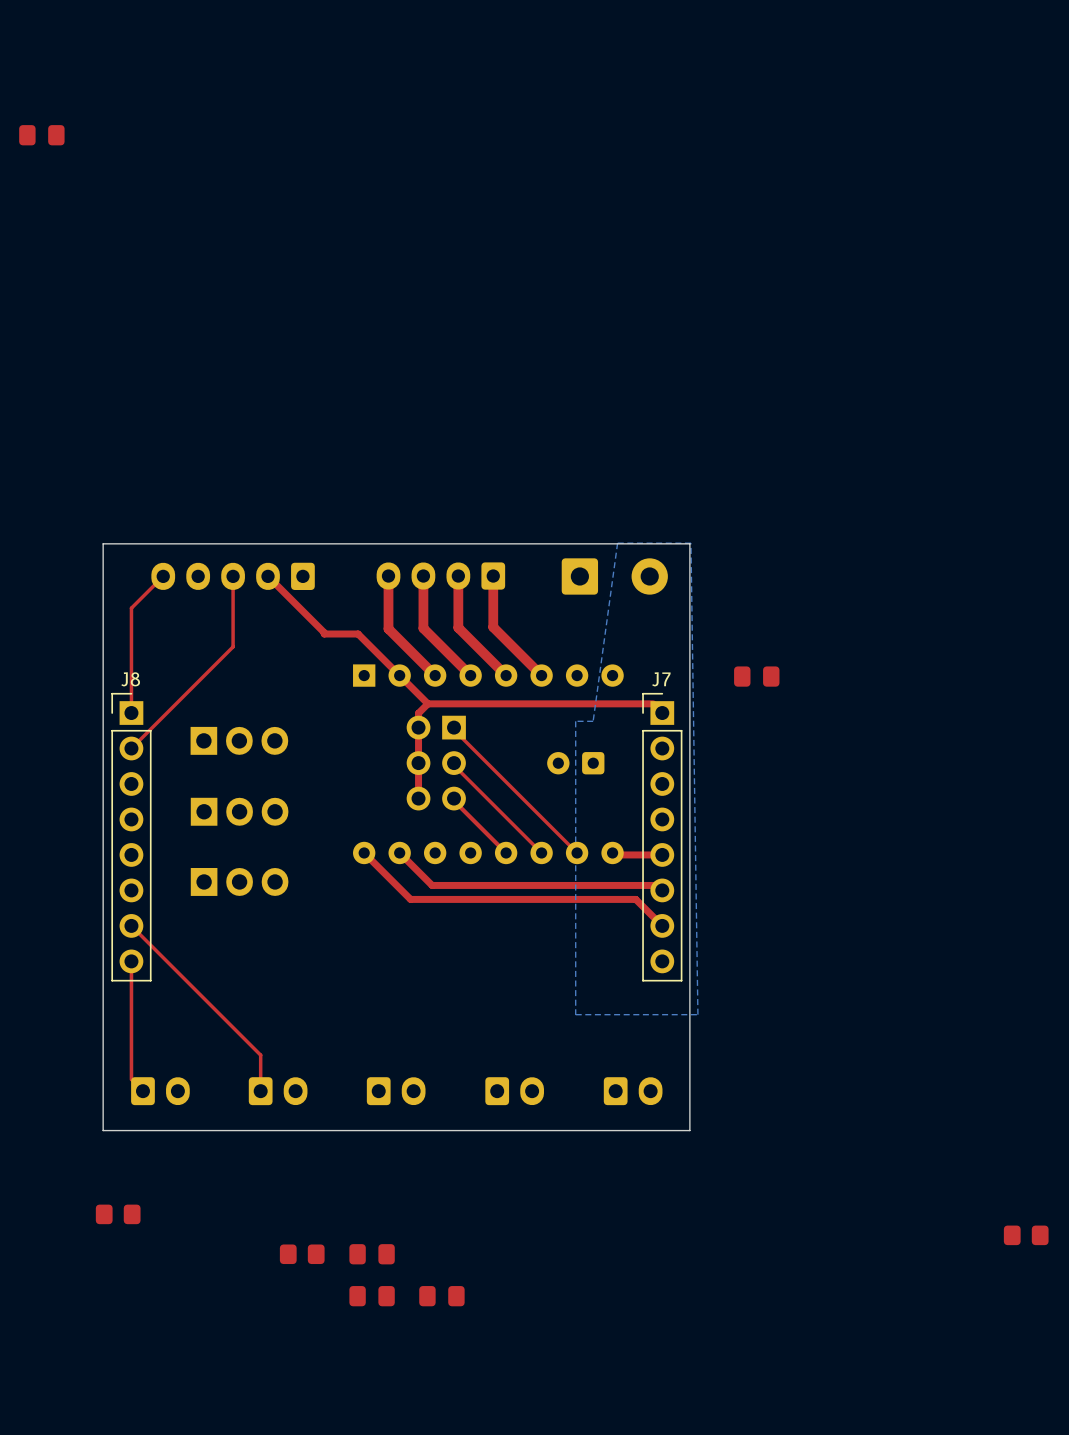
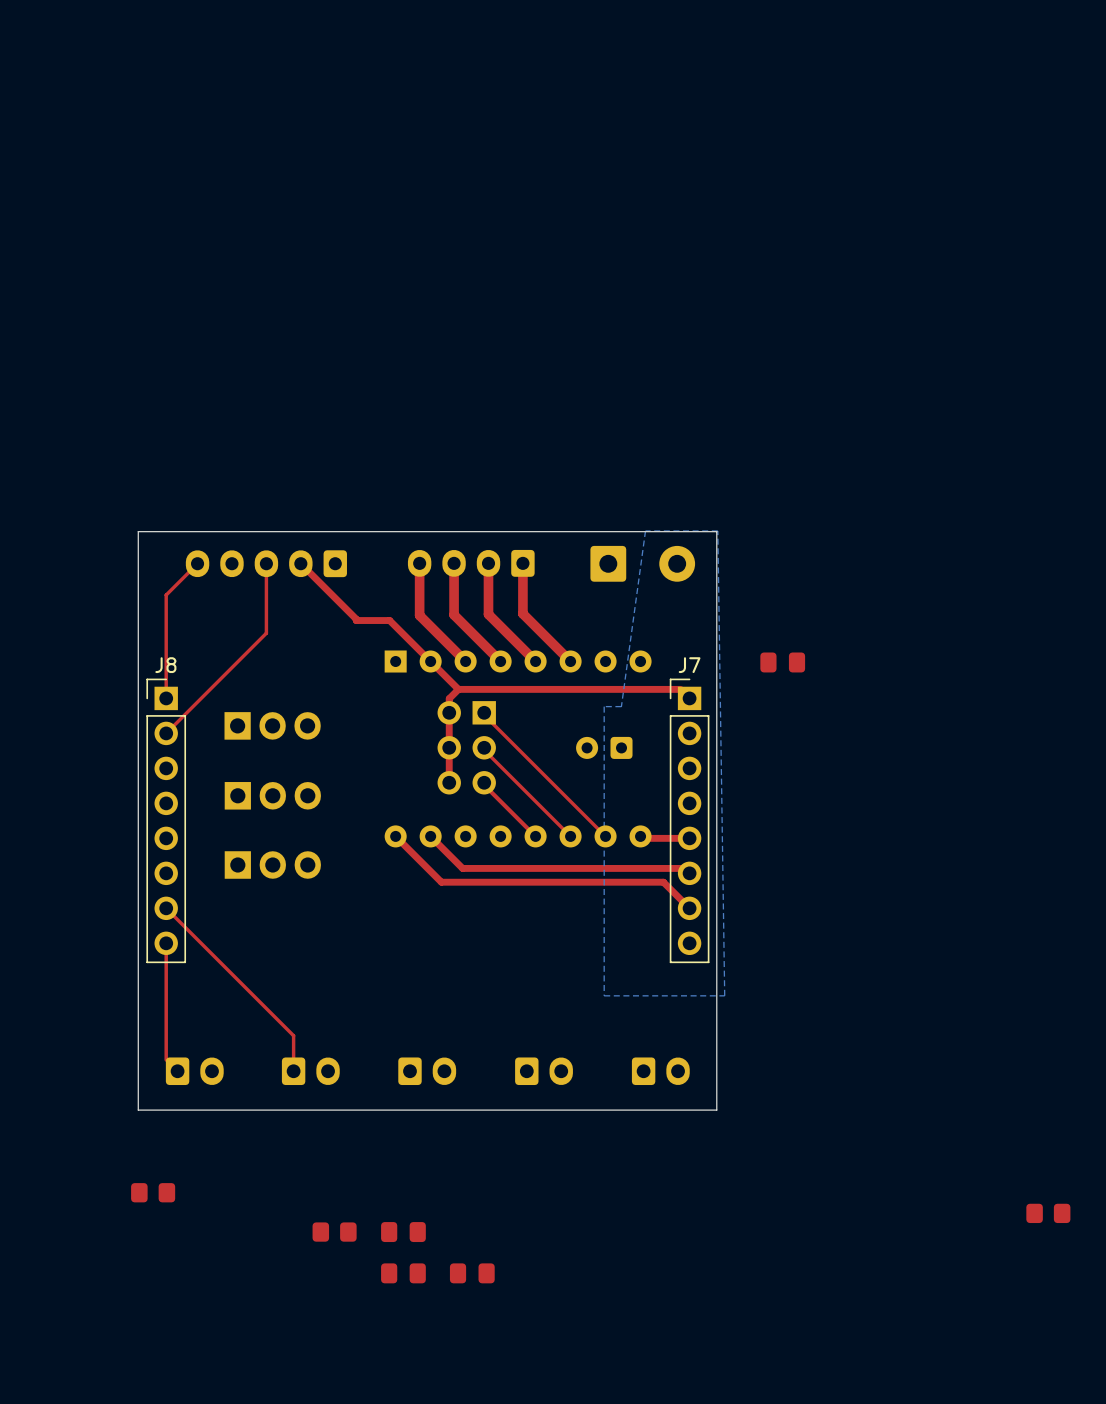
part: (41, 135) -> none

